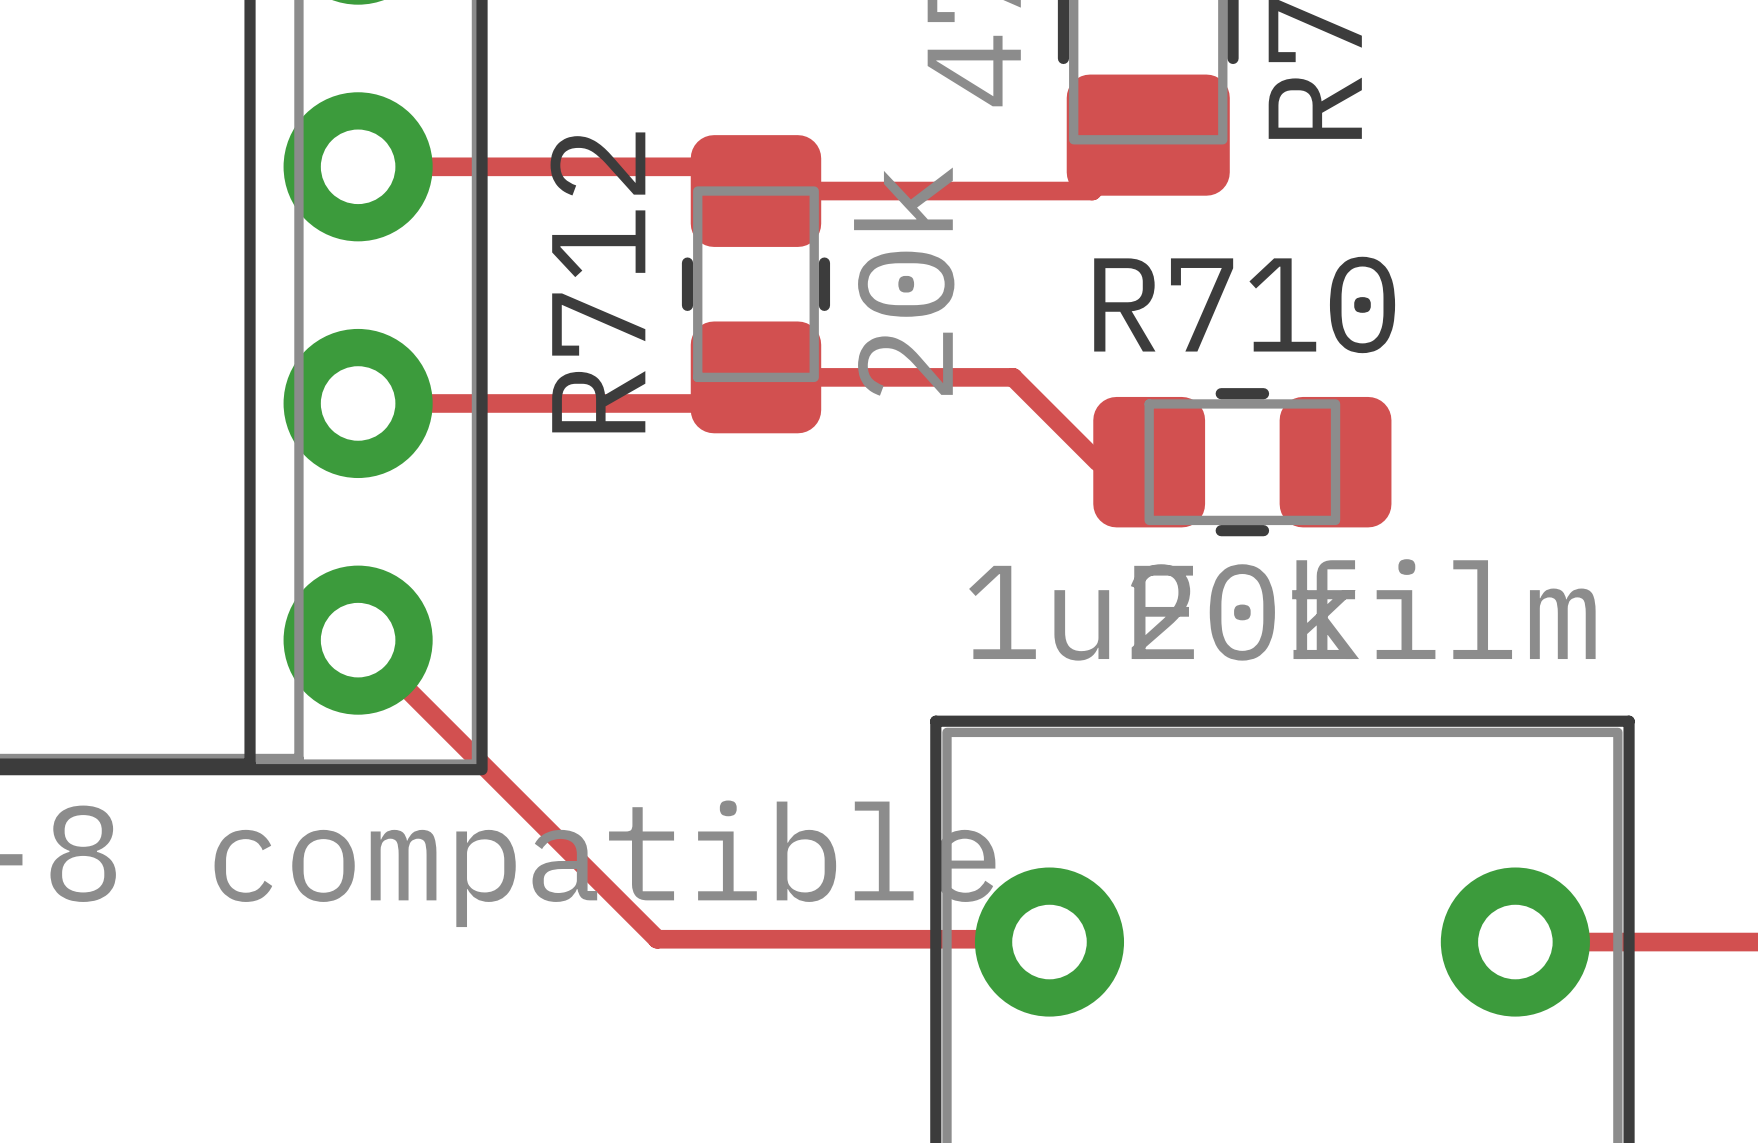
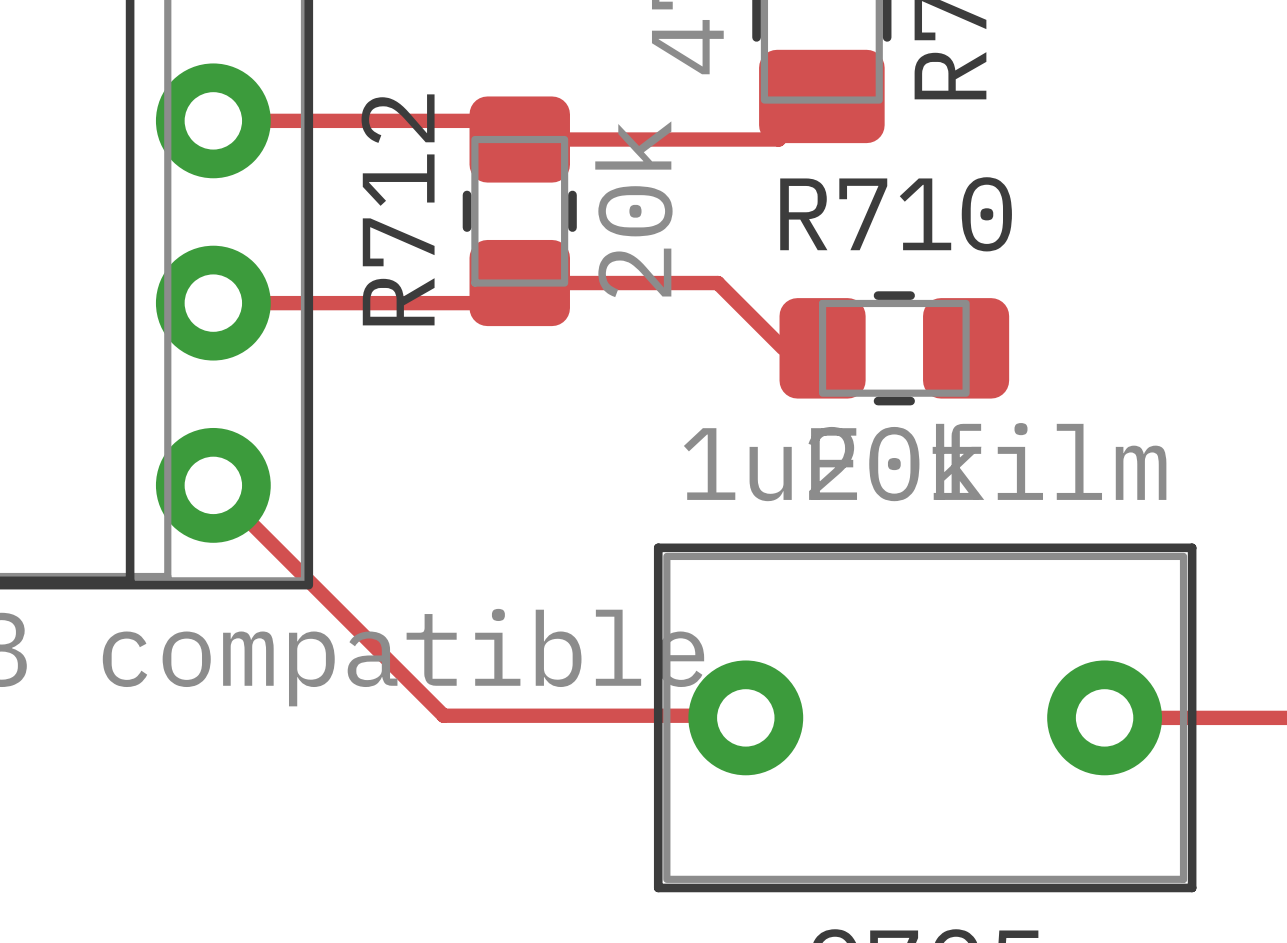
R710 name position: R710 (1244, 304) -> R710 (896, 214)

